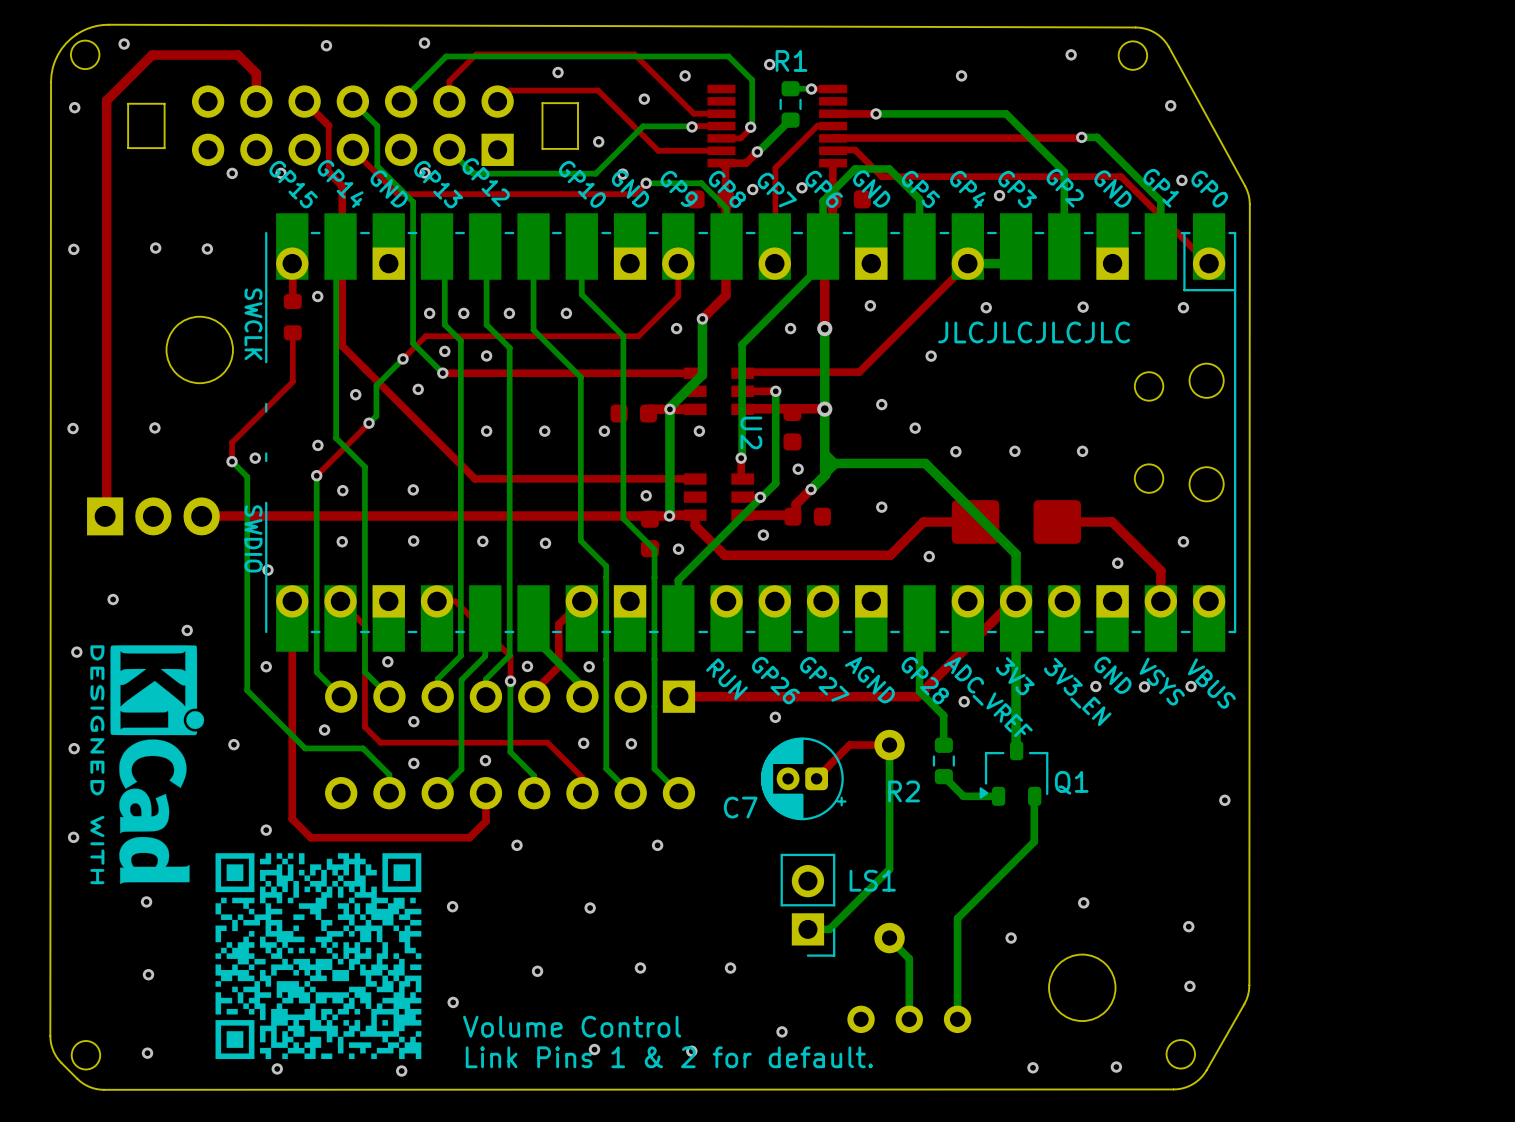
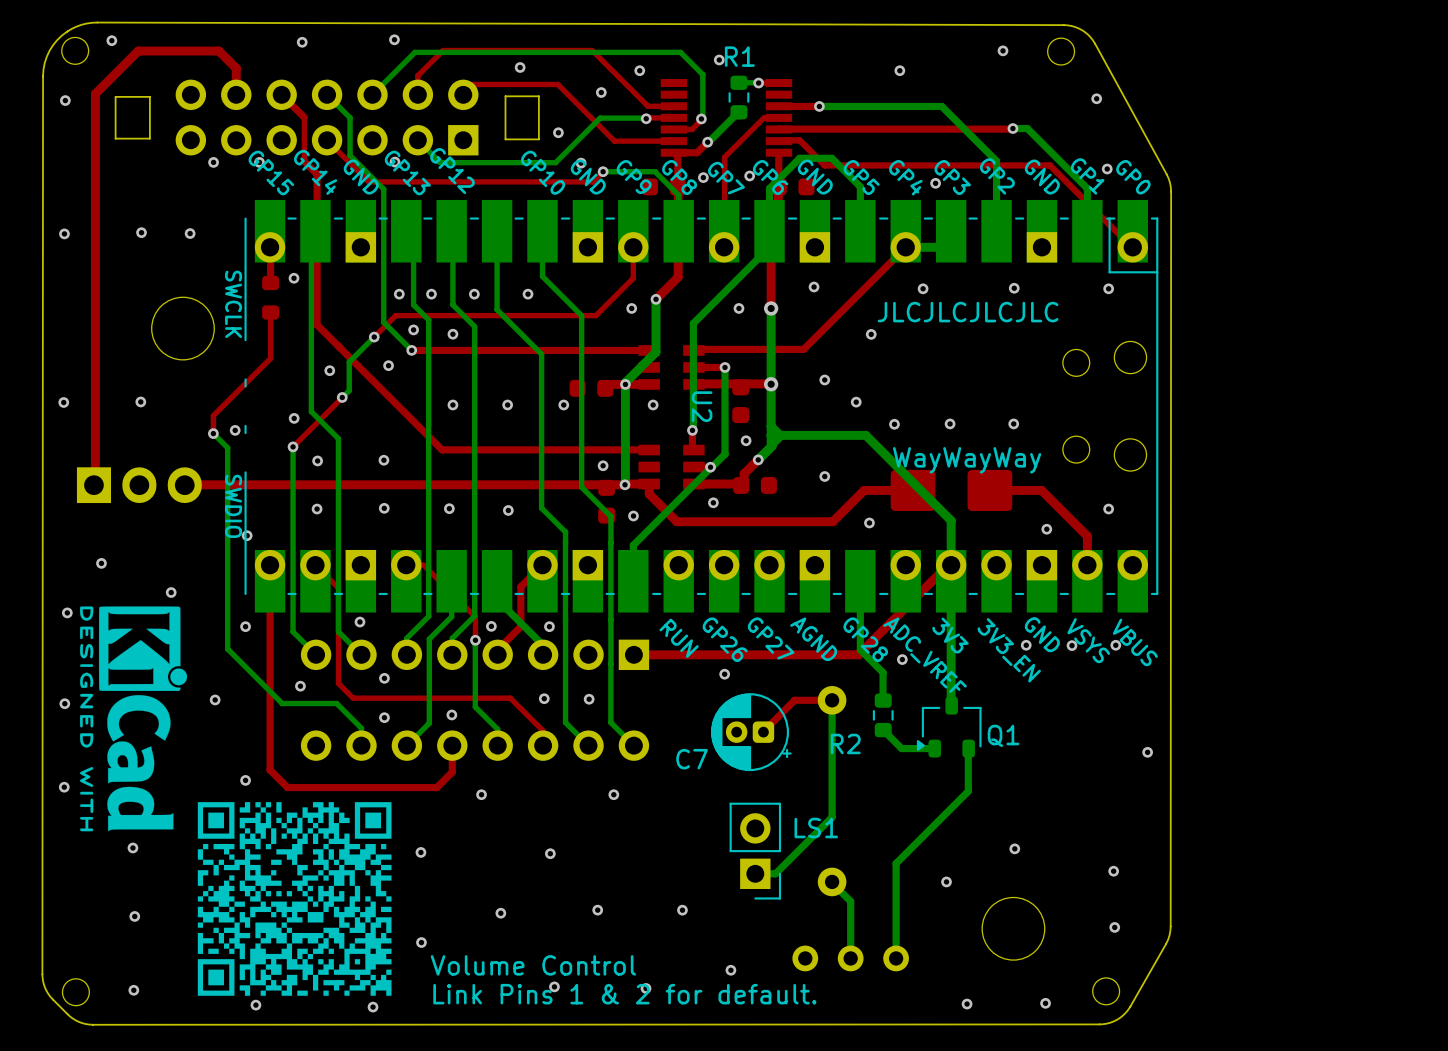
text: none -> WayWayWay (967, 460)

